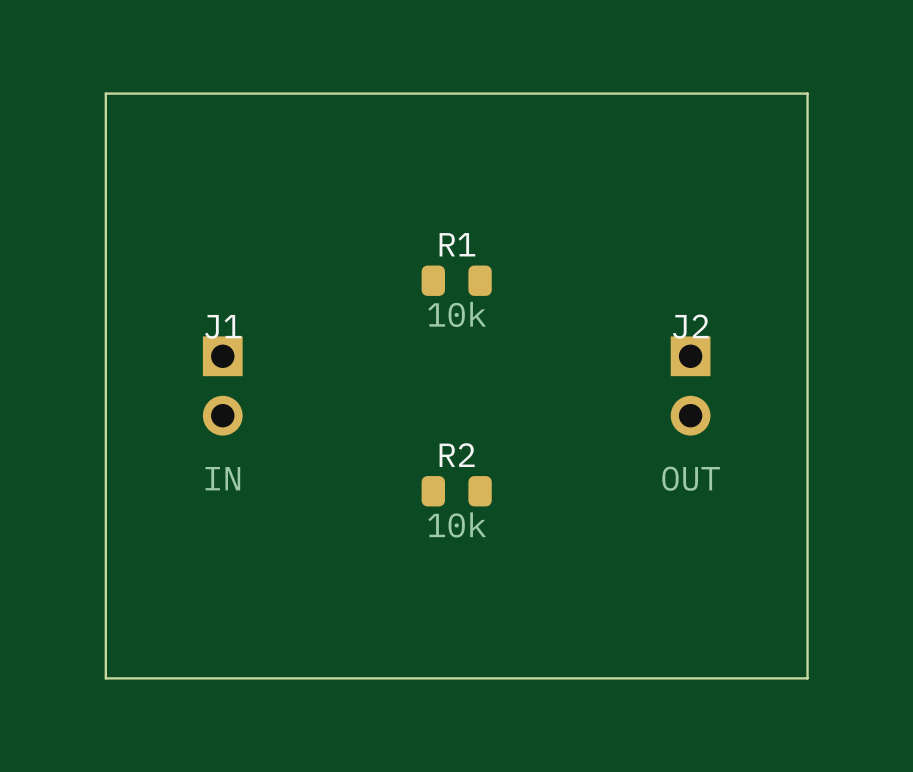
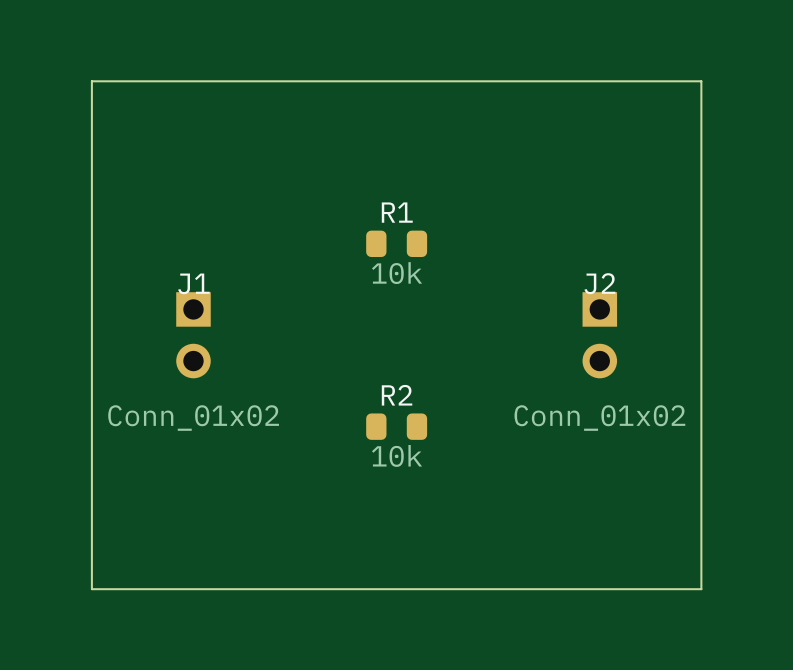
J1 value: IN (222, 478) -> Conn_01x02 (193, 418)
J2 value: OUT (691, 478) -> Conn_01x02 (599, 418)

